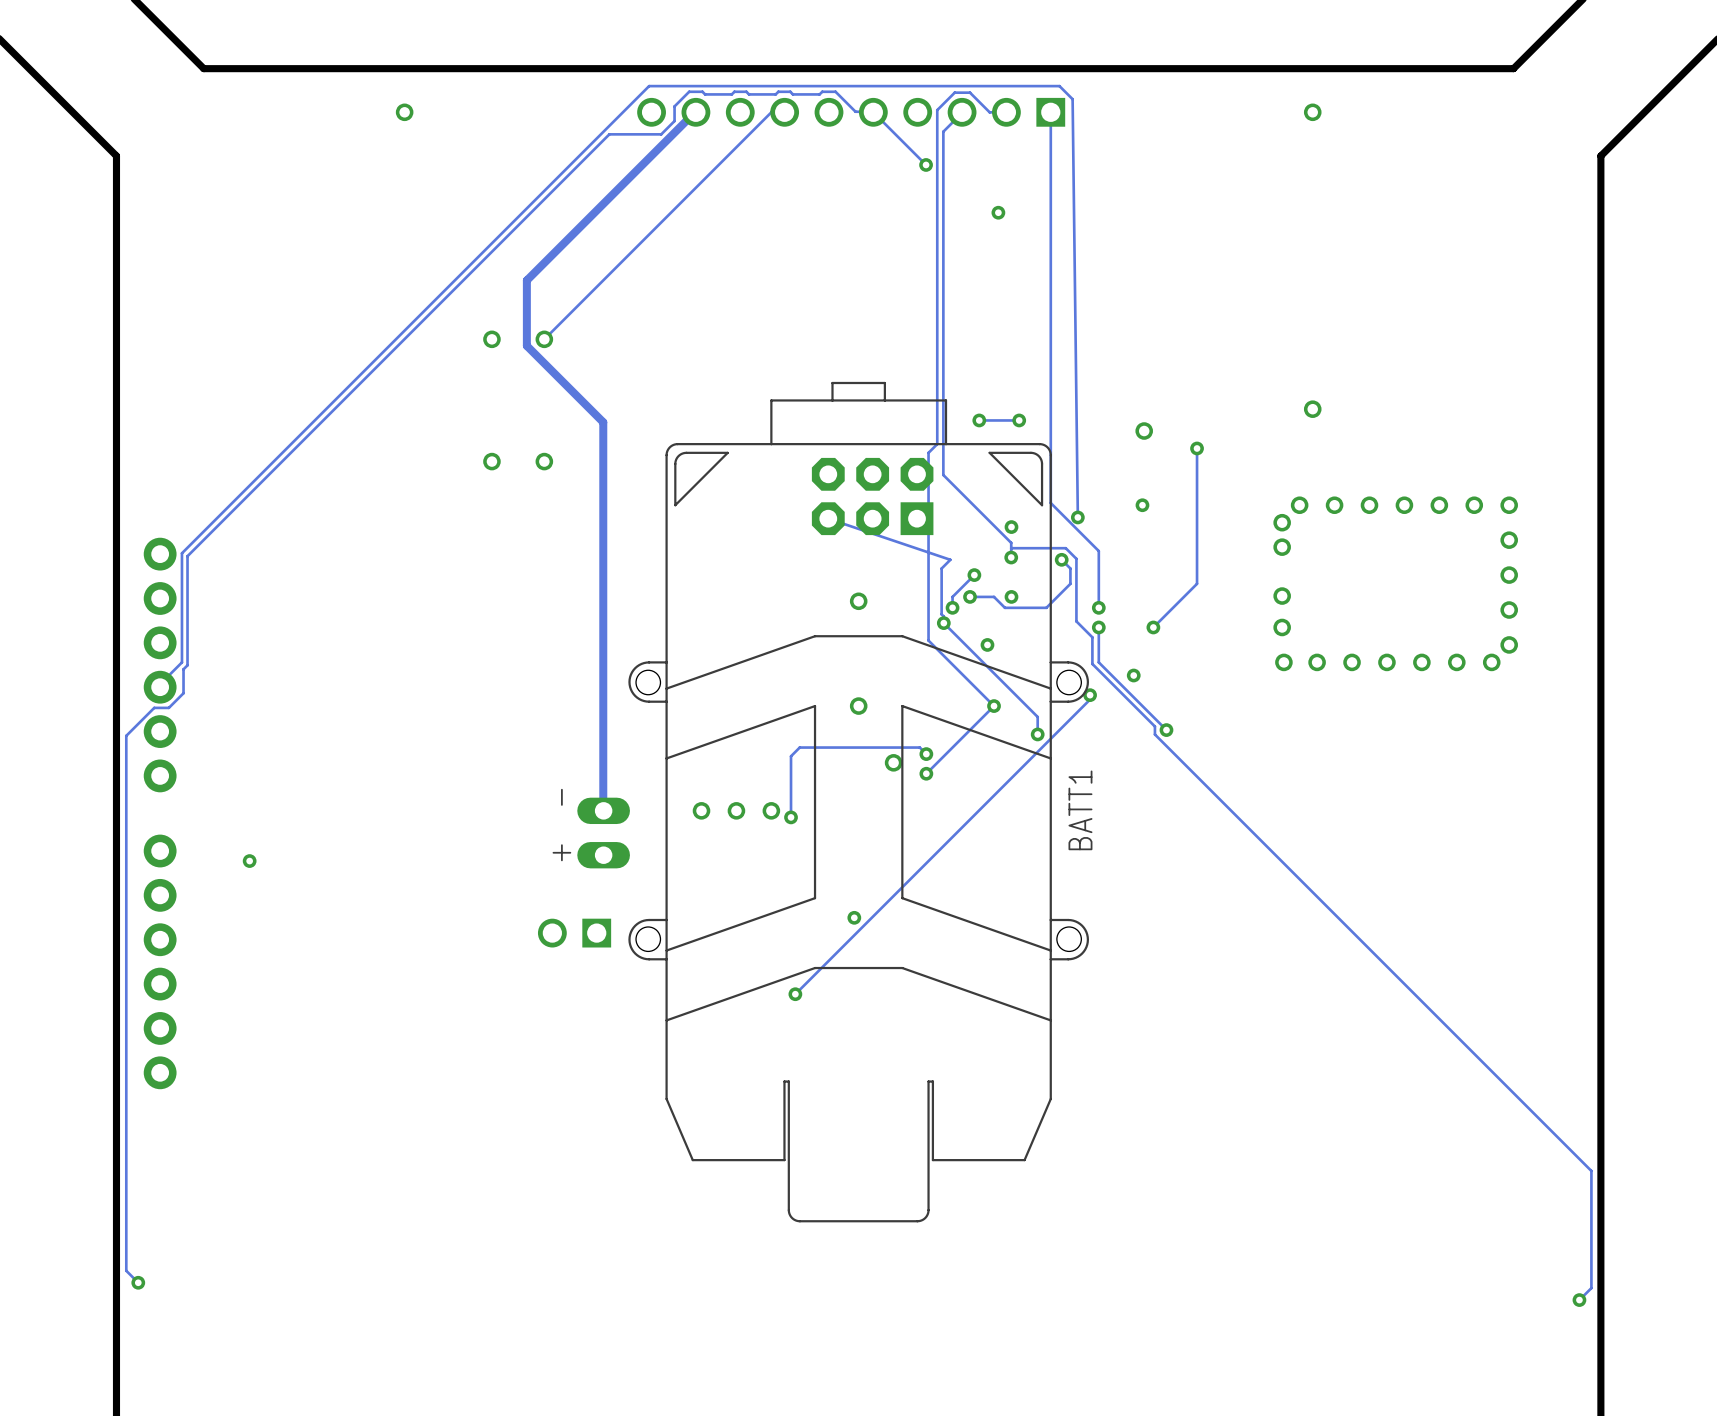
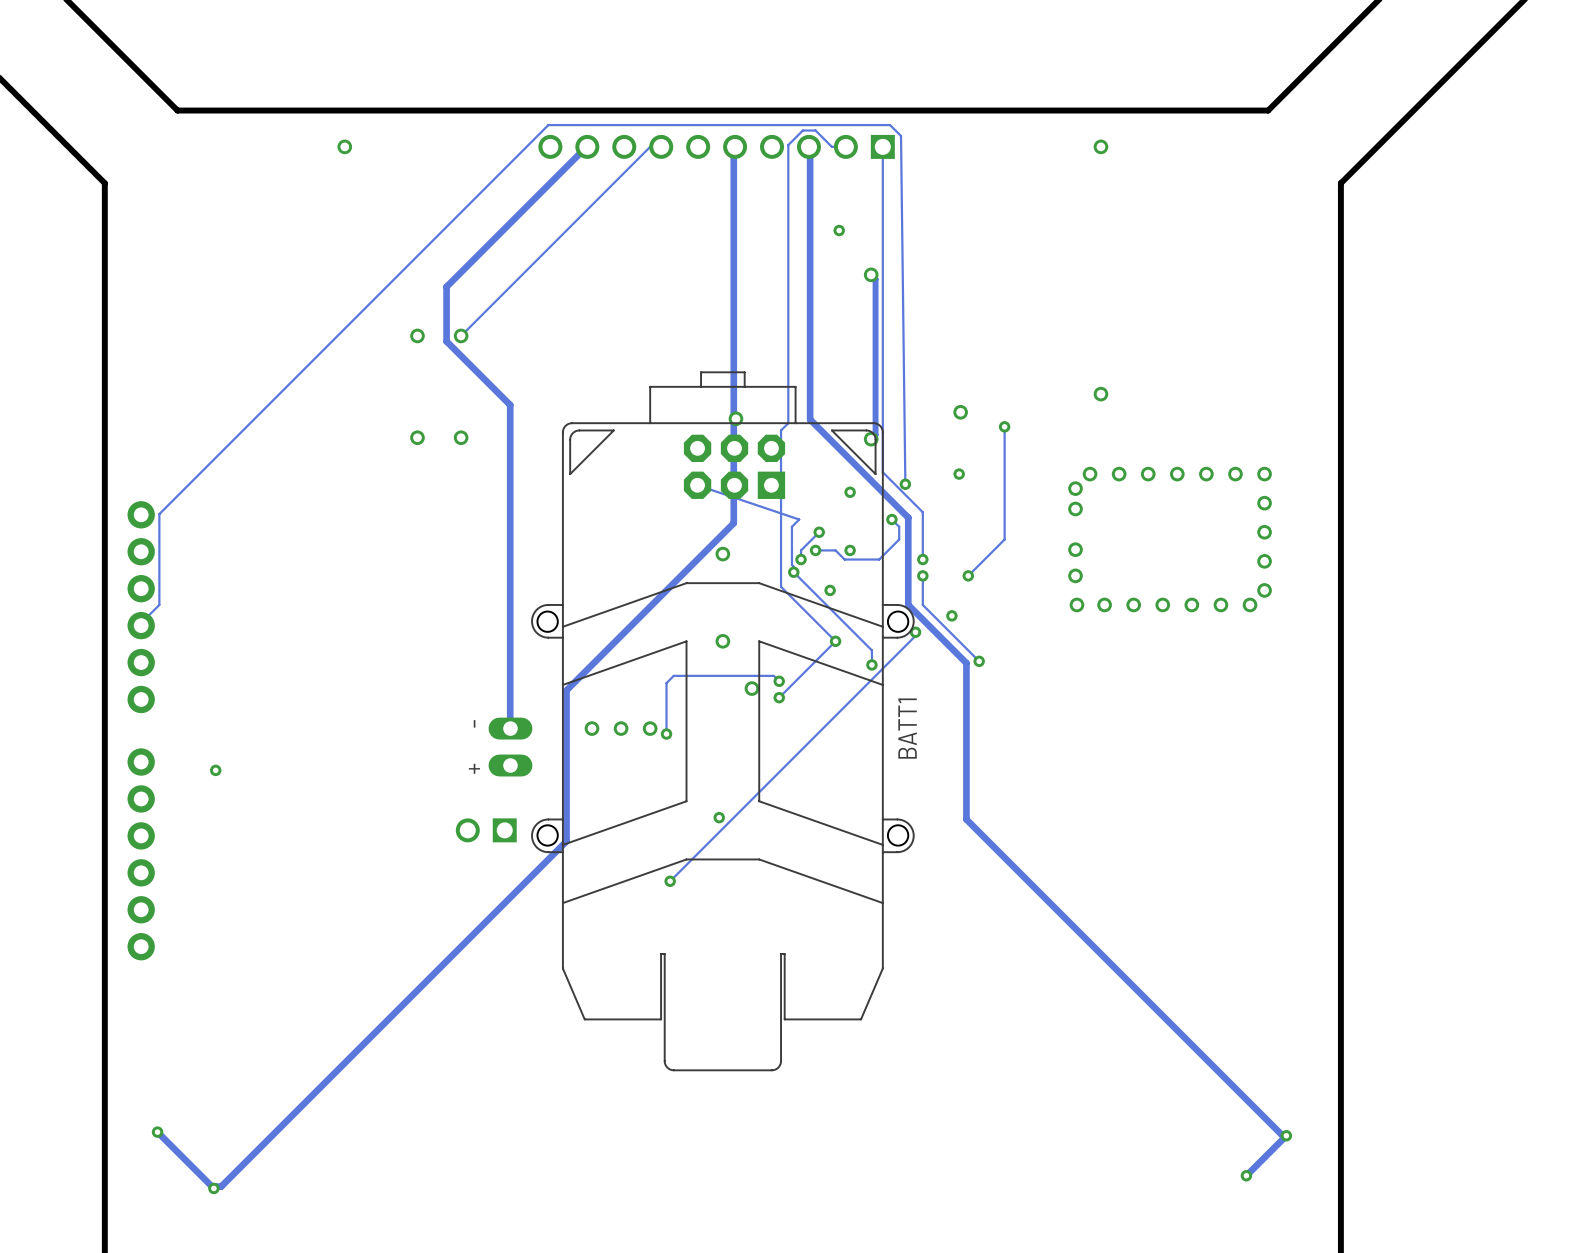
track: none -> (735, 146) (733, 523) (566, 690) (566, 841) (221, 1186) (213, 1188) (157, 1132)
track: (962, 112) (943, 131) (943, 475) (1011, 542) (1011, 557) -> (808, 146) (810, 419) (908, 517) (908, 604) (966, 663) (966, 819) (1282, 1135) (1286, 1135) (1246, 1175)
track: (926, 164) (872, 111) (855, 111) (835, 91) (822, 91) (819, 94) (792, 94) (790, 91) (778, 91) (775, 94) (749, 94) (746, 91) (734, 91) (731, 94) (705, 94) (702, 91) (689, 91) (674, 106) (674, 121) (661, 134) (609, 134) (187, 556) (187, 665) (183, 669) (183, 693) (168, 707) (154, 707) (126, 735) (126, 1270) (138, 1282) -> none
via: (926, 164) -> none
track: none -> (871, 274) (875, 279) (875, 434) (871, 439)
via: none -> (871, 274)
via: (979, 420) -> none
track: (1019, 420) (979, 420) -> none
via: (1019, 420) -> none
via: none -> (735, 418)
via: none -> (871, 439)
track: (1011, 548) (1065, 548) (1076, 558) (1076, 621) (1092, 637) (1092, 663) (1154, 726) (1154, 734) (1591, 1170) (1591, 1288) (1579, 1300) -> none
via: (1011, 557) -> none
via position: (138, 1282) -> (157, 1132)
via position: (1579, 1300) -> (1286, 1135)
via: none -> (1246, 1175)
via: none -> (213, 1188)

